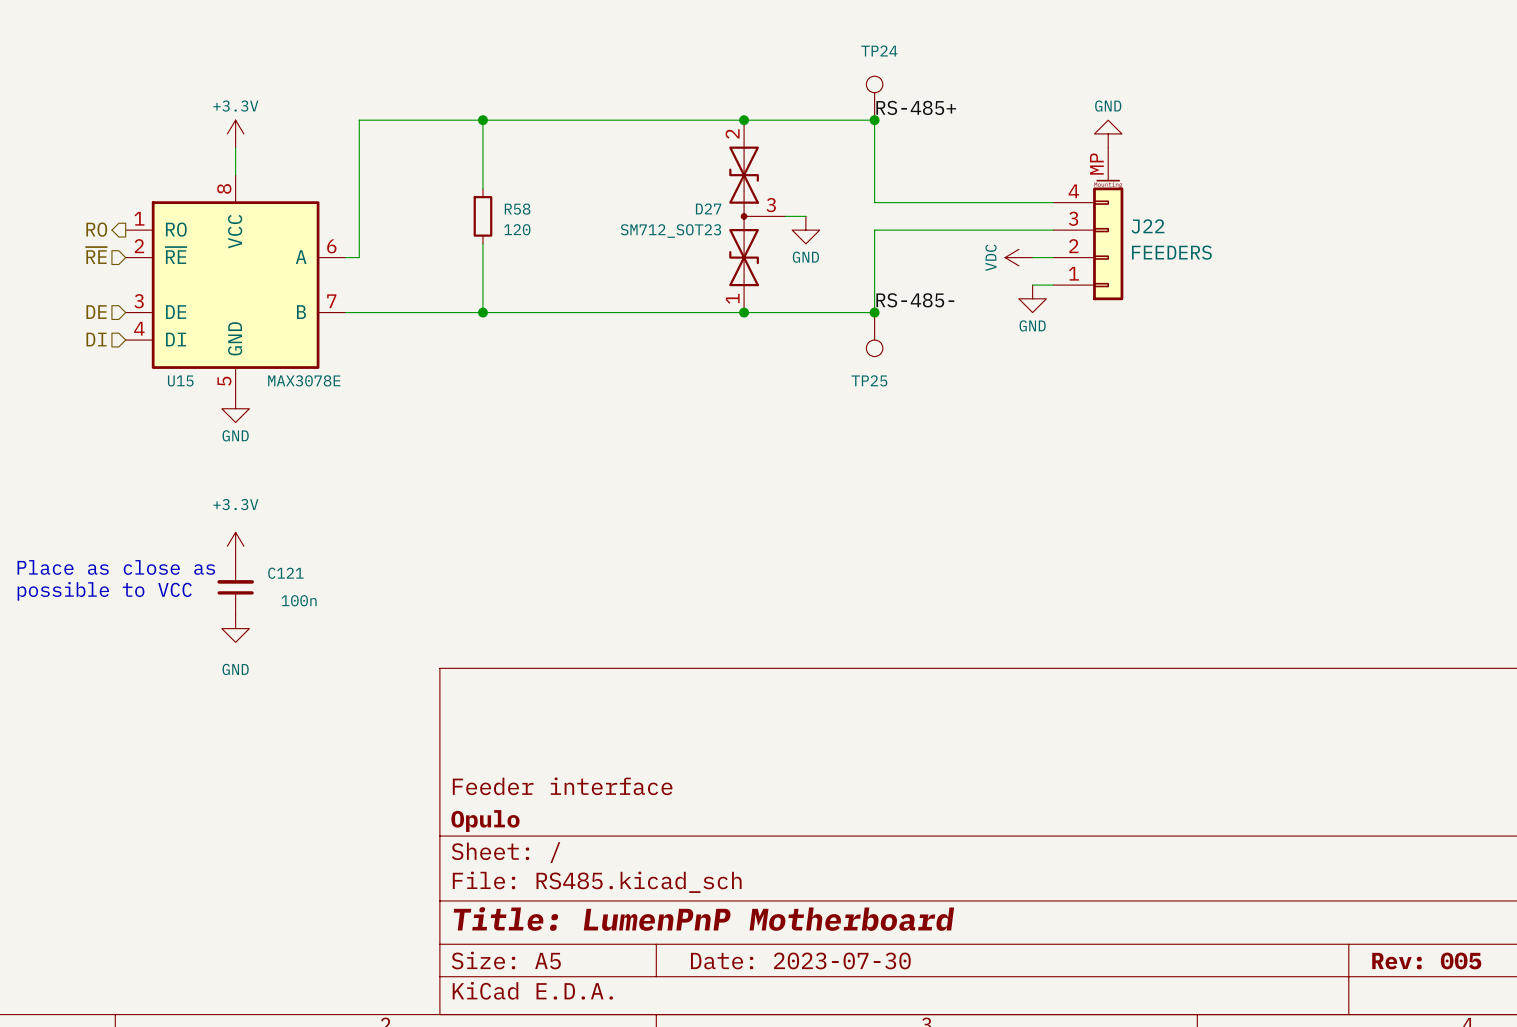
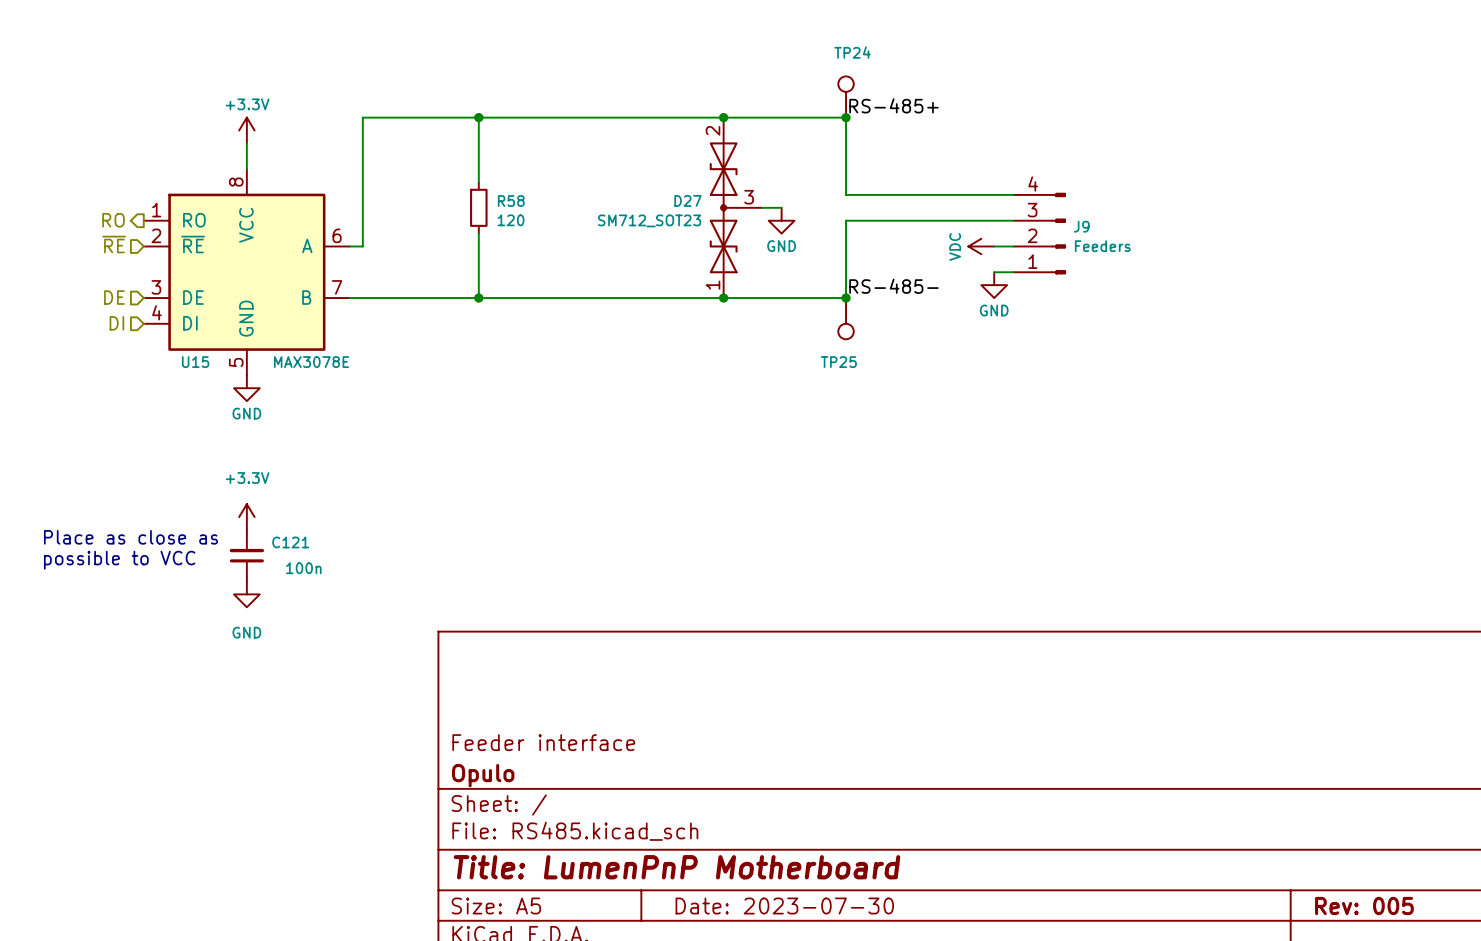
power symbol: GND (1108, 133) -> none
J22: FEEDERS (1088, 223) -> none
J9: none -> Feeders (1039, 233)

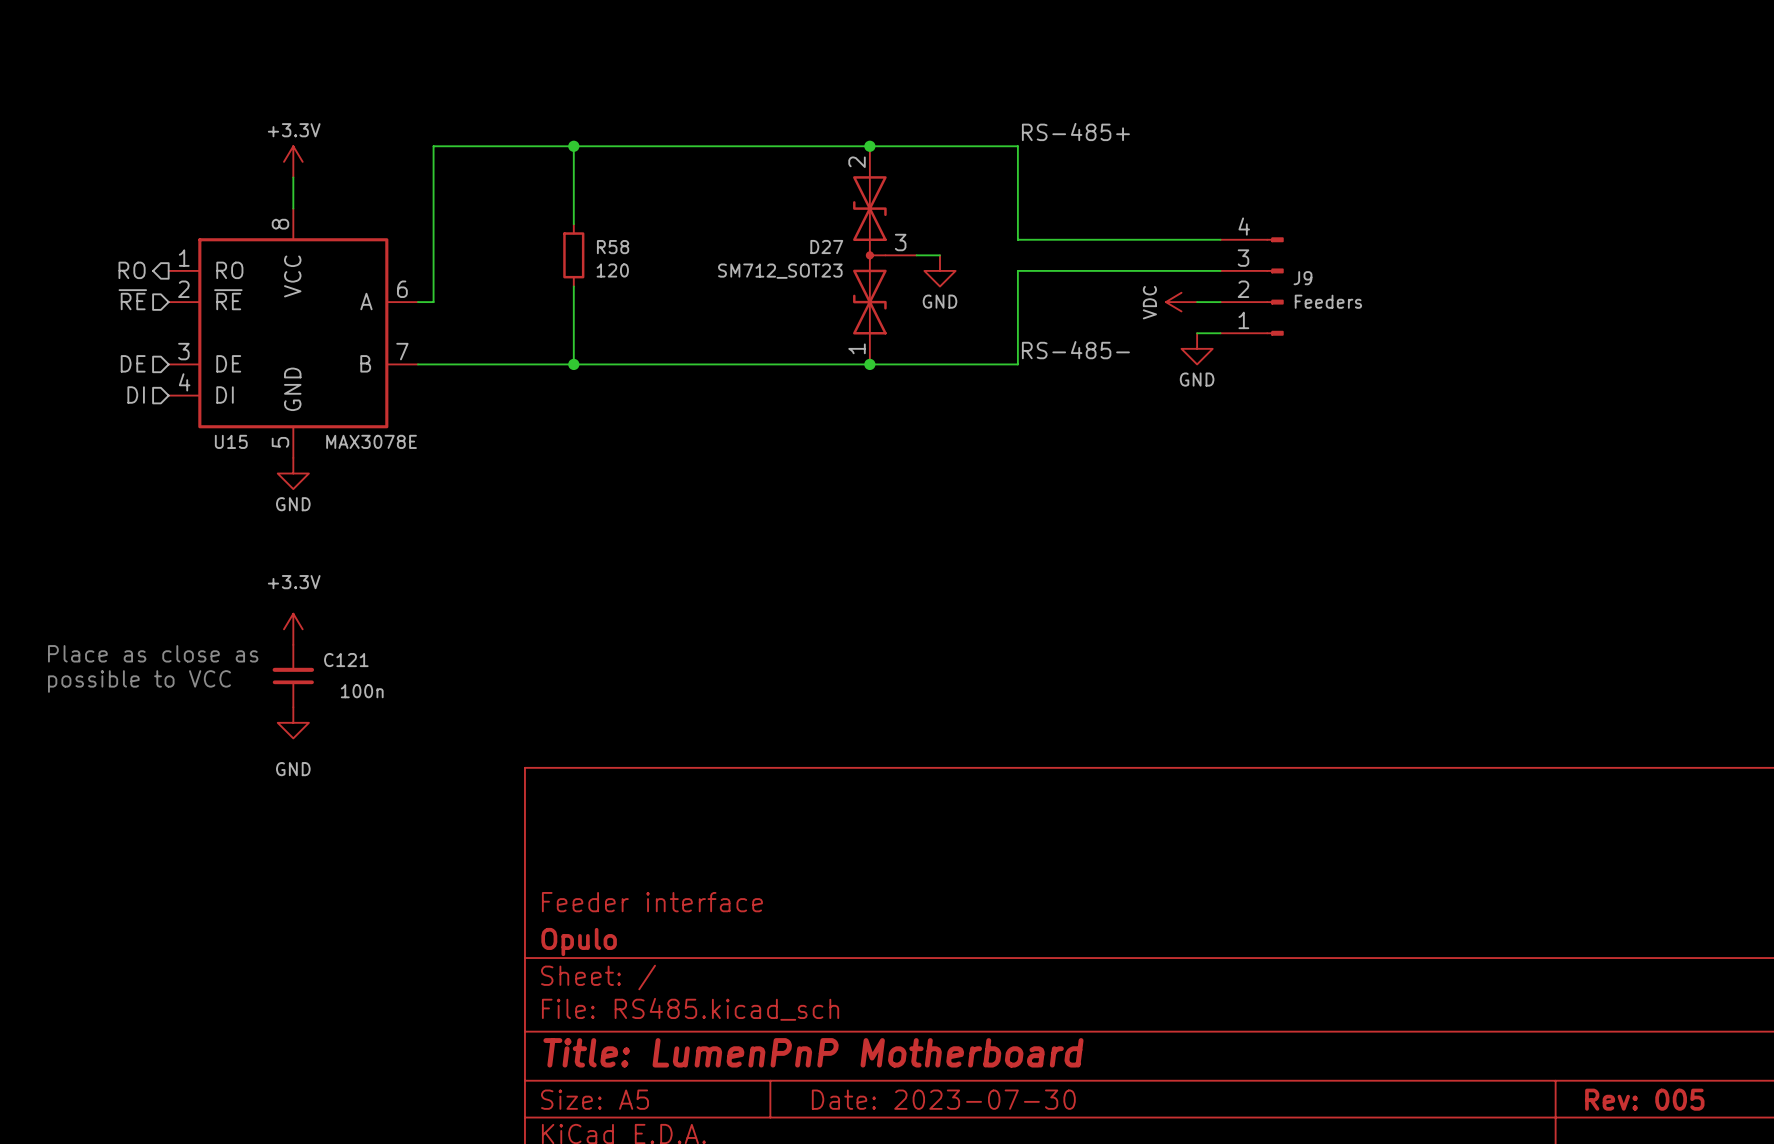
TP24: (846, 97) -> none
junction: (846, 117) -> none
junction: (846, 298) -> none
TP25: (846, 318) -> none

